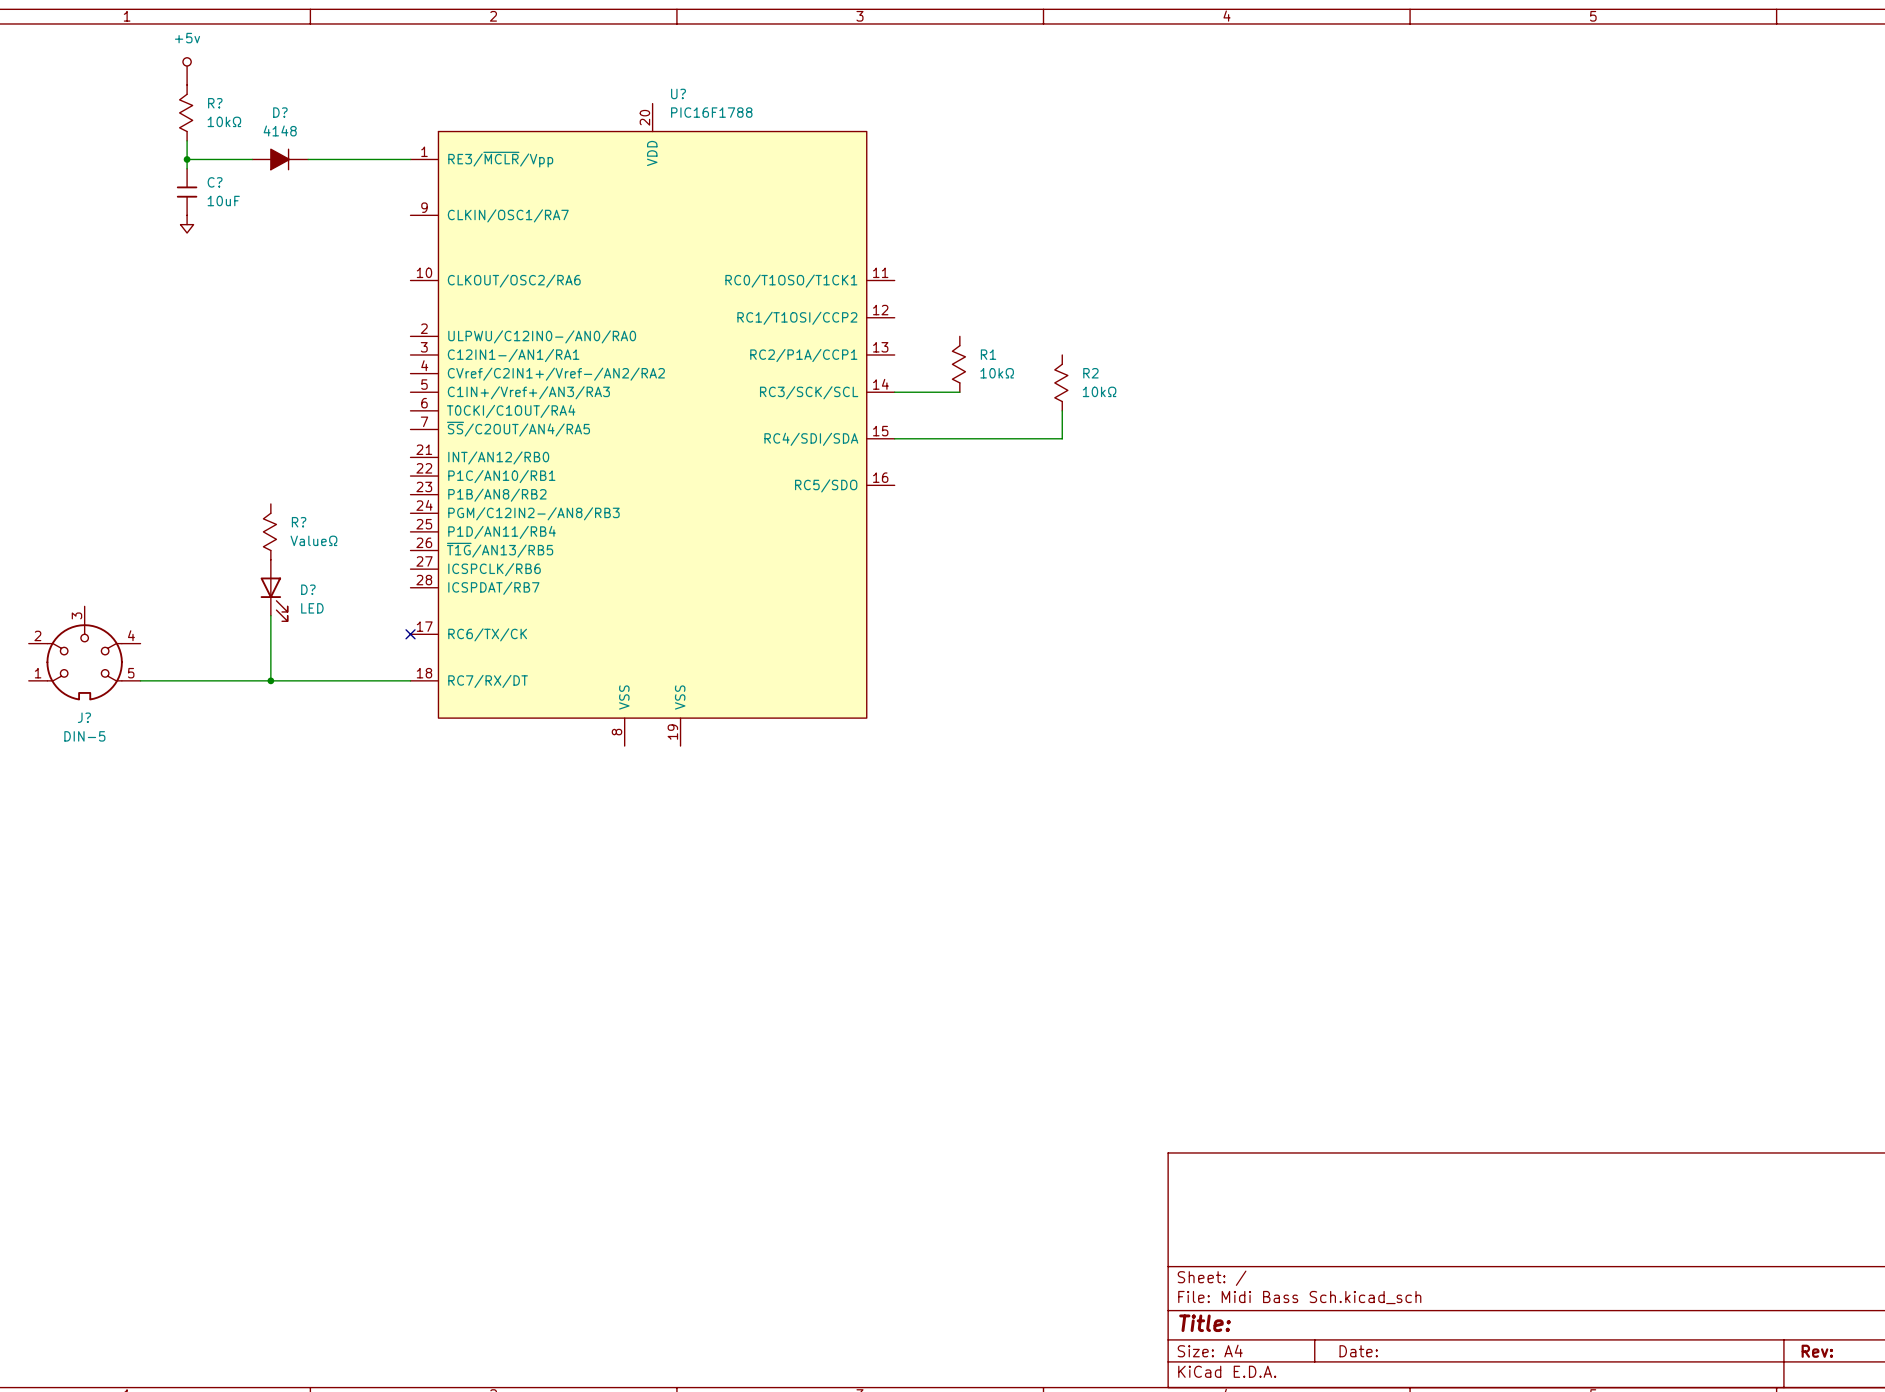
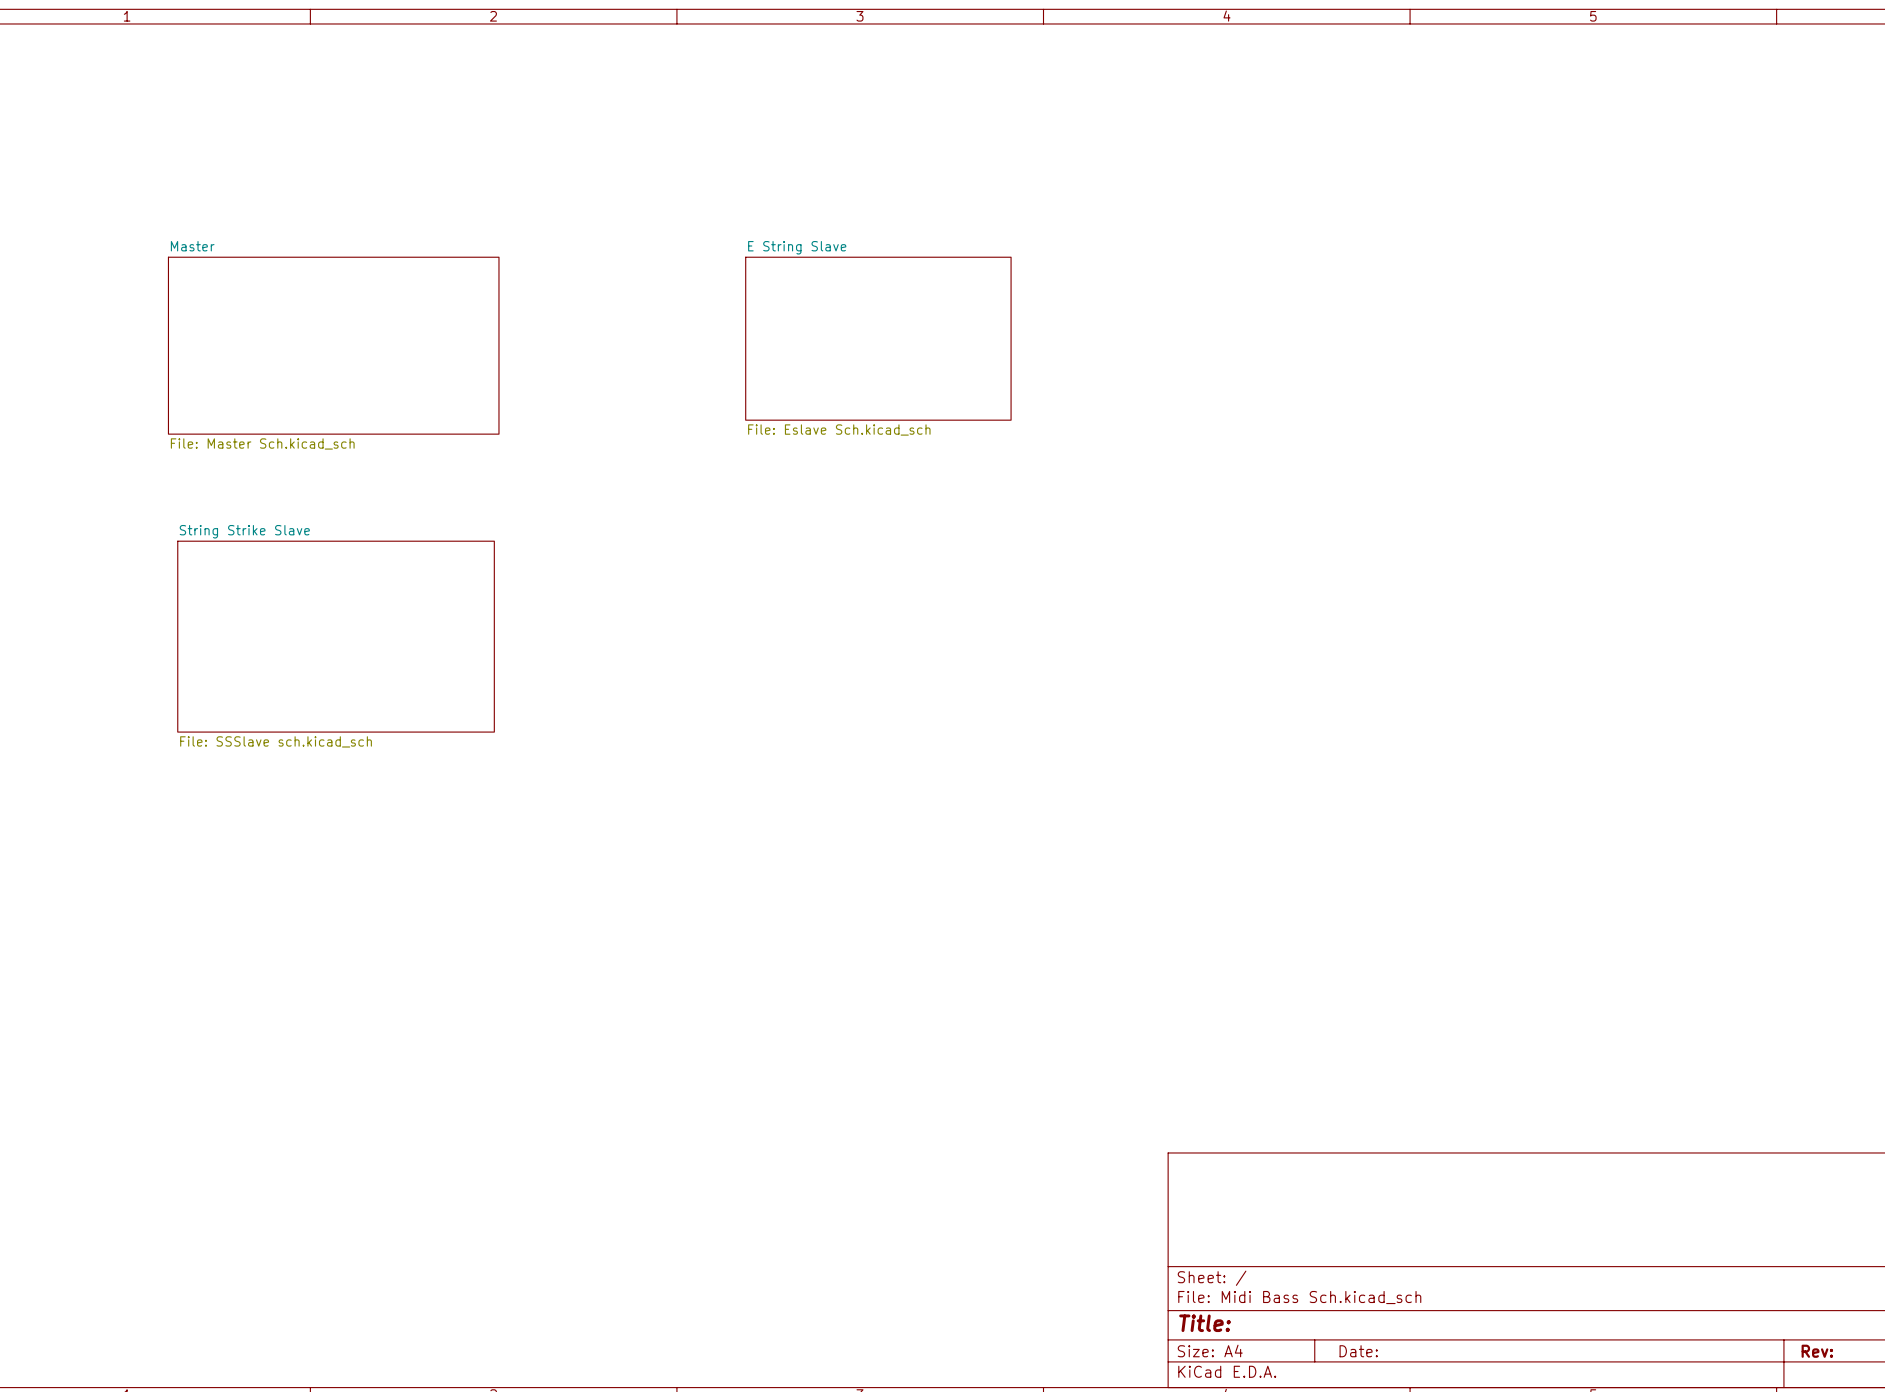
power symbol: +5v (187, 71) -> none
R?: 10kΩ (186, 112) -> none
wire: (187, 140) (187, 168) -> none
wire: (187, 159) (252, 159) -> none
junction: (187, 159) -> none
D?: 4148 (280, 159) -> none
wire: (308, 159) (410, 159) -> none
C?: 10uF (187, 192) -> none
power symbol: (187, 224) -> none
sheet E String Slave: none -> File: Eslave Sch.kicad_sch (878, 338)
sheet Master: none -> File: Master Sch.kicad_sch (333, 345)
R1: 10kΩ (958, 364) -> none
R2: 10kΩ (1061, 382) -> none
wire: (894, 392) (959, 392) -> none
wire: (1062, 410) (1062, 438) (894, 438) -> none
U?: PIC16F1788 (652, 424) -> none
R?: ValueΩ (269, 531) -> none
D?: LED (274, 590) -> none
wire: (270, 615) (270, 680) -> none
no-connect mark: (410, 634) -> none
sheet String Strike Slave: none -> File: SSSlave sch.kicad_sch (336, 636)
J?: DIN-5 (84, 653) -> none
wire: (140, 680) (410, 680) -> none
junction: (270, 680) -> none

